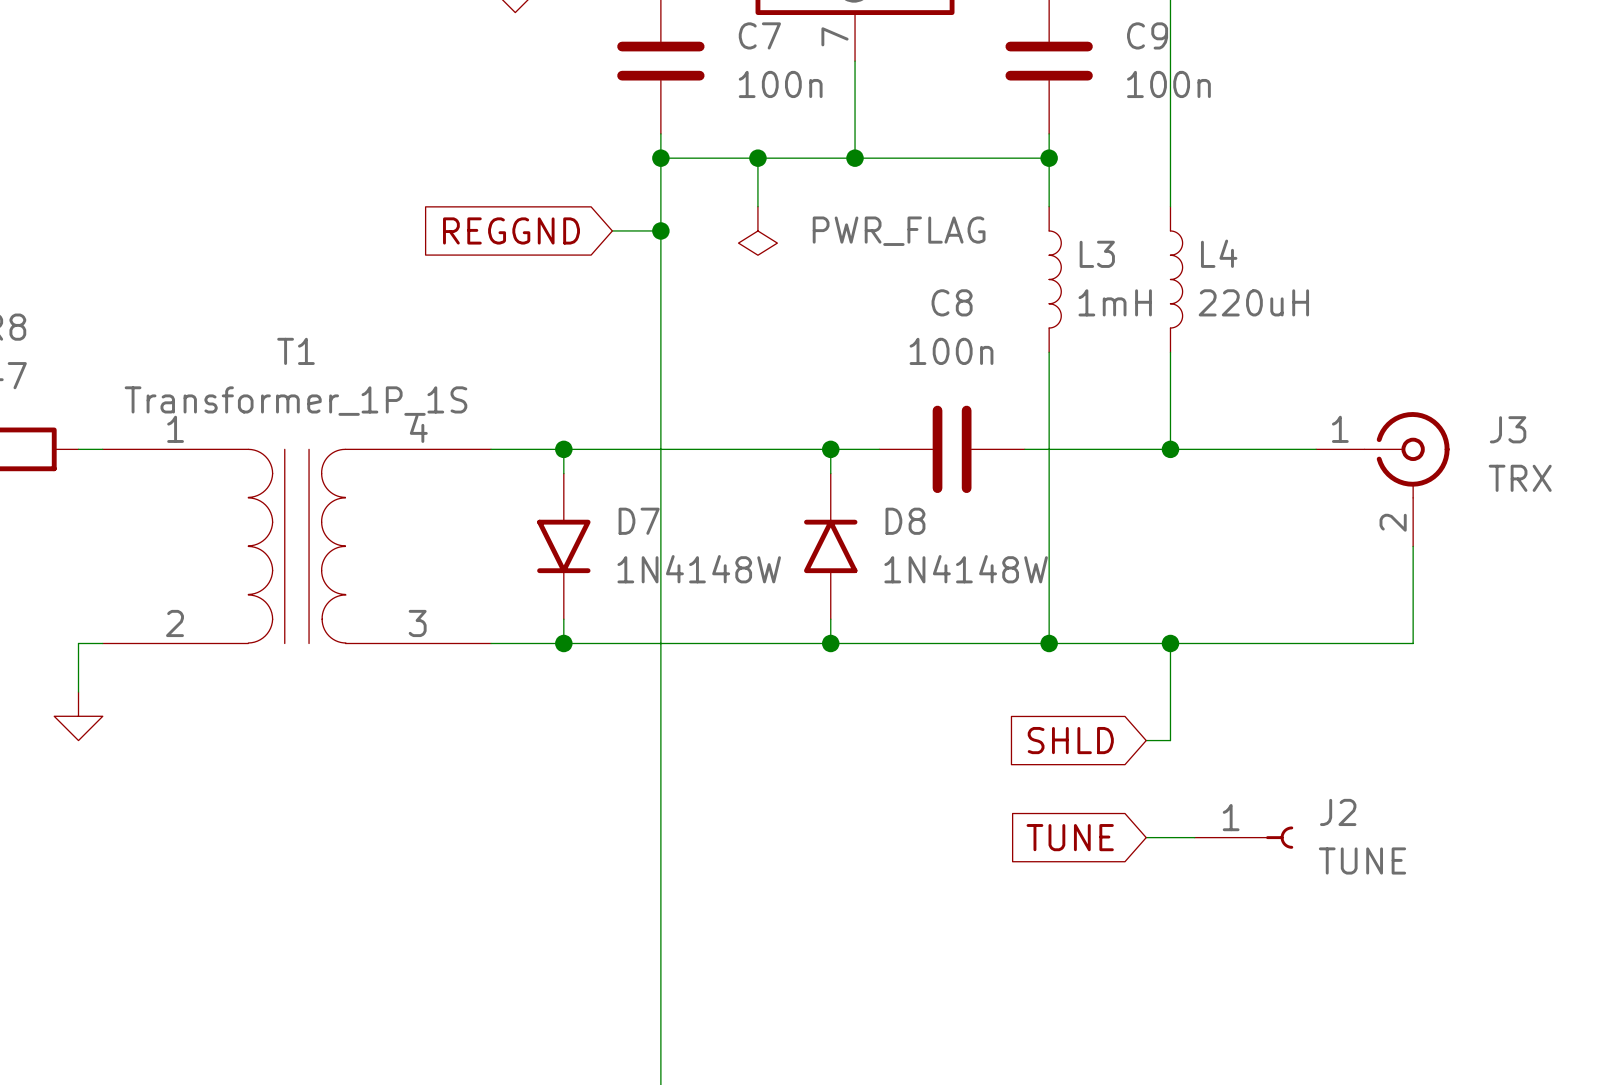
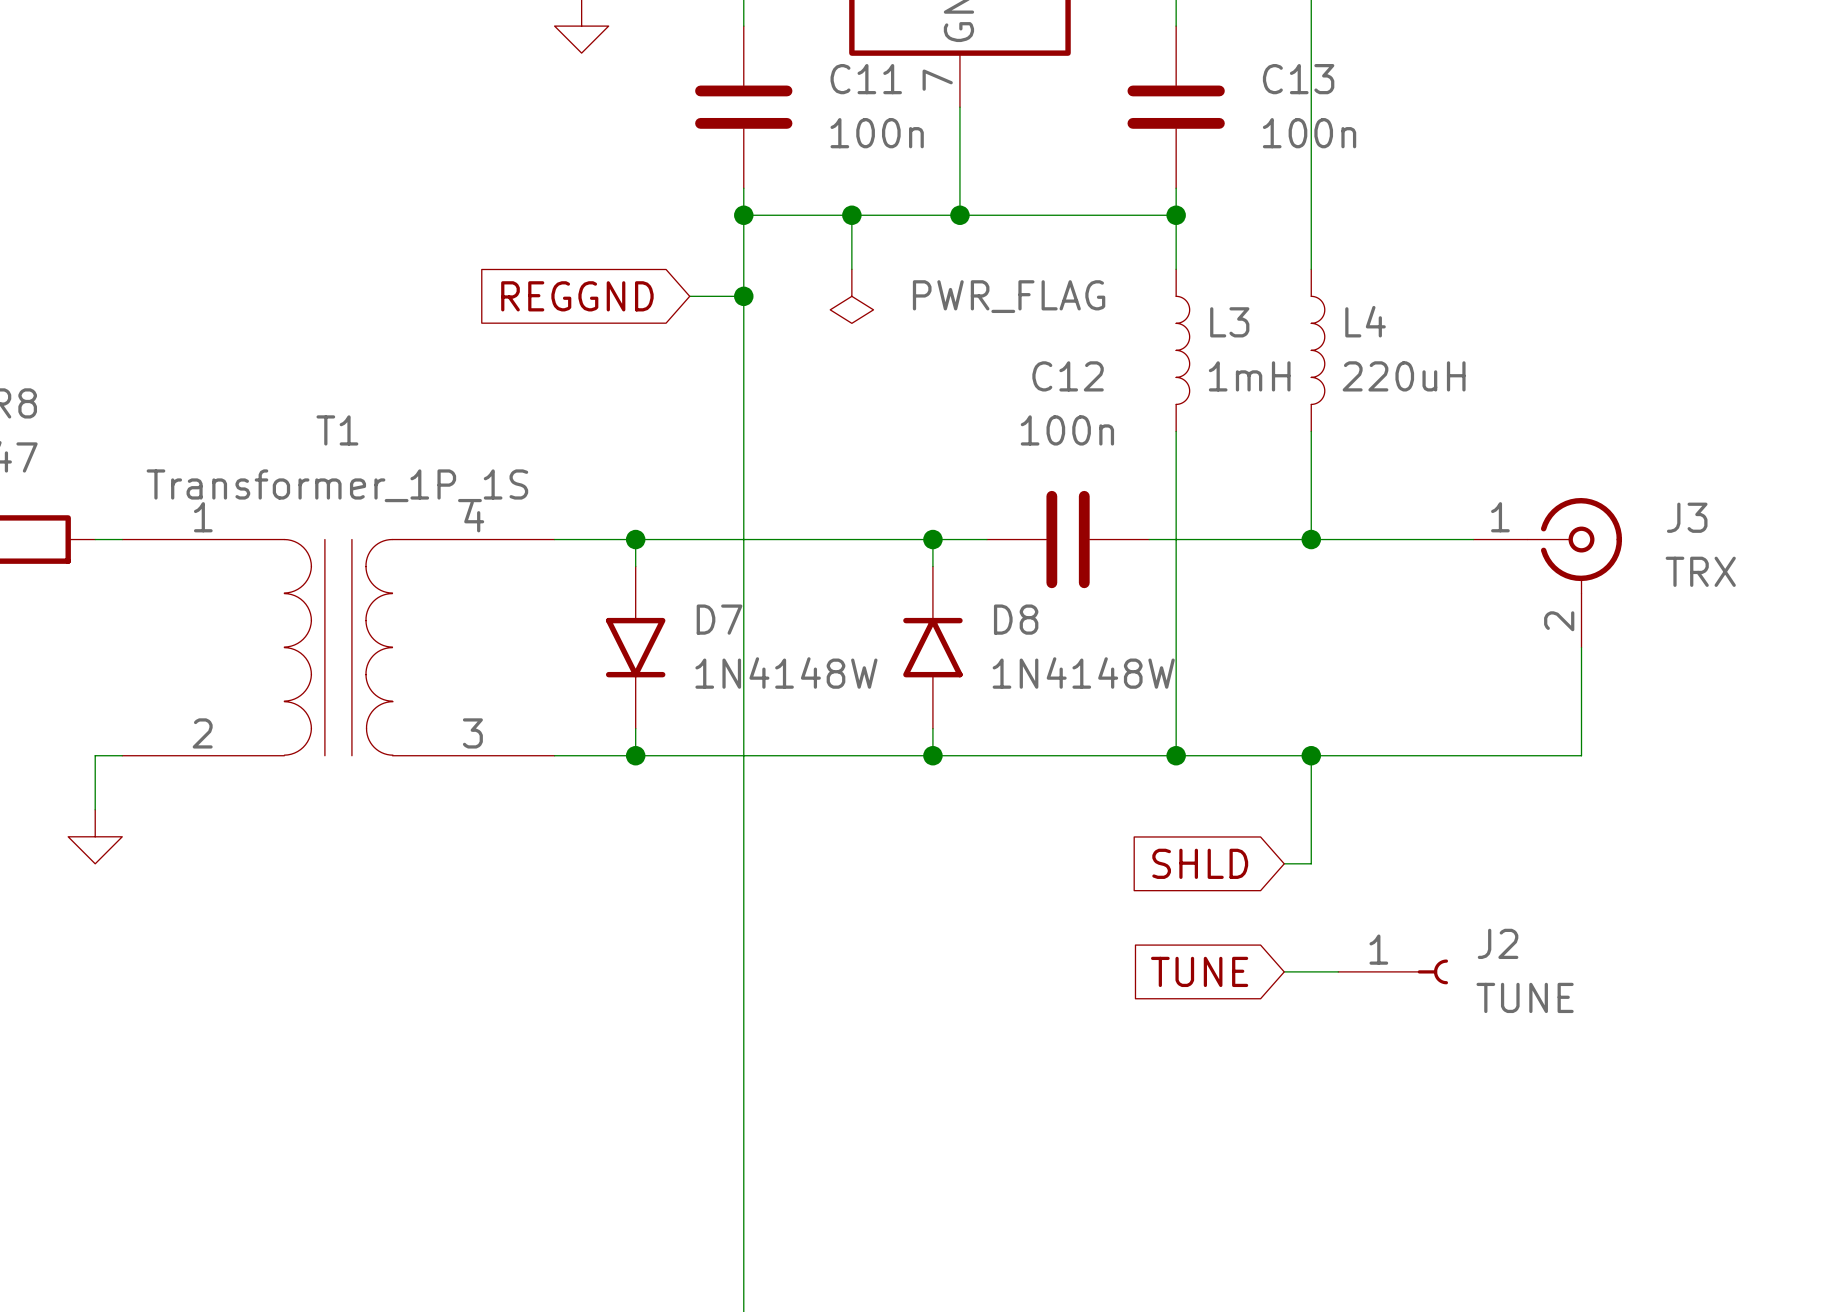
C7 name: C7 (759, 35) -> C11 (866, 79)
C9 name: C9 (1147, 35) -> C13 (1298, 79)
C8 name: C8 (952, 302) -> C12 (1068, 376)

